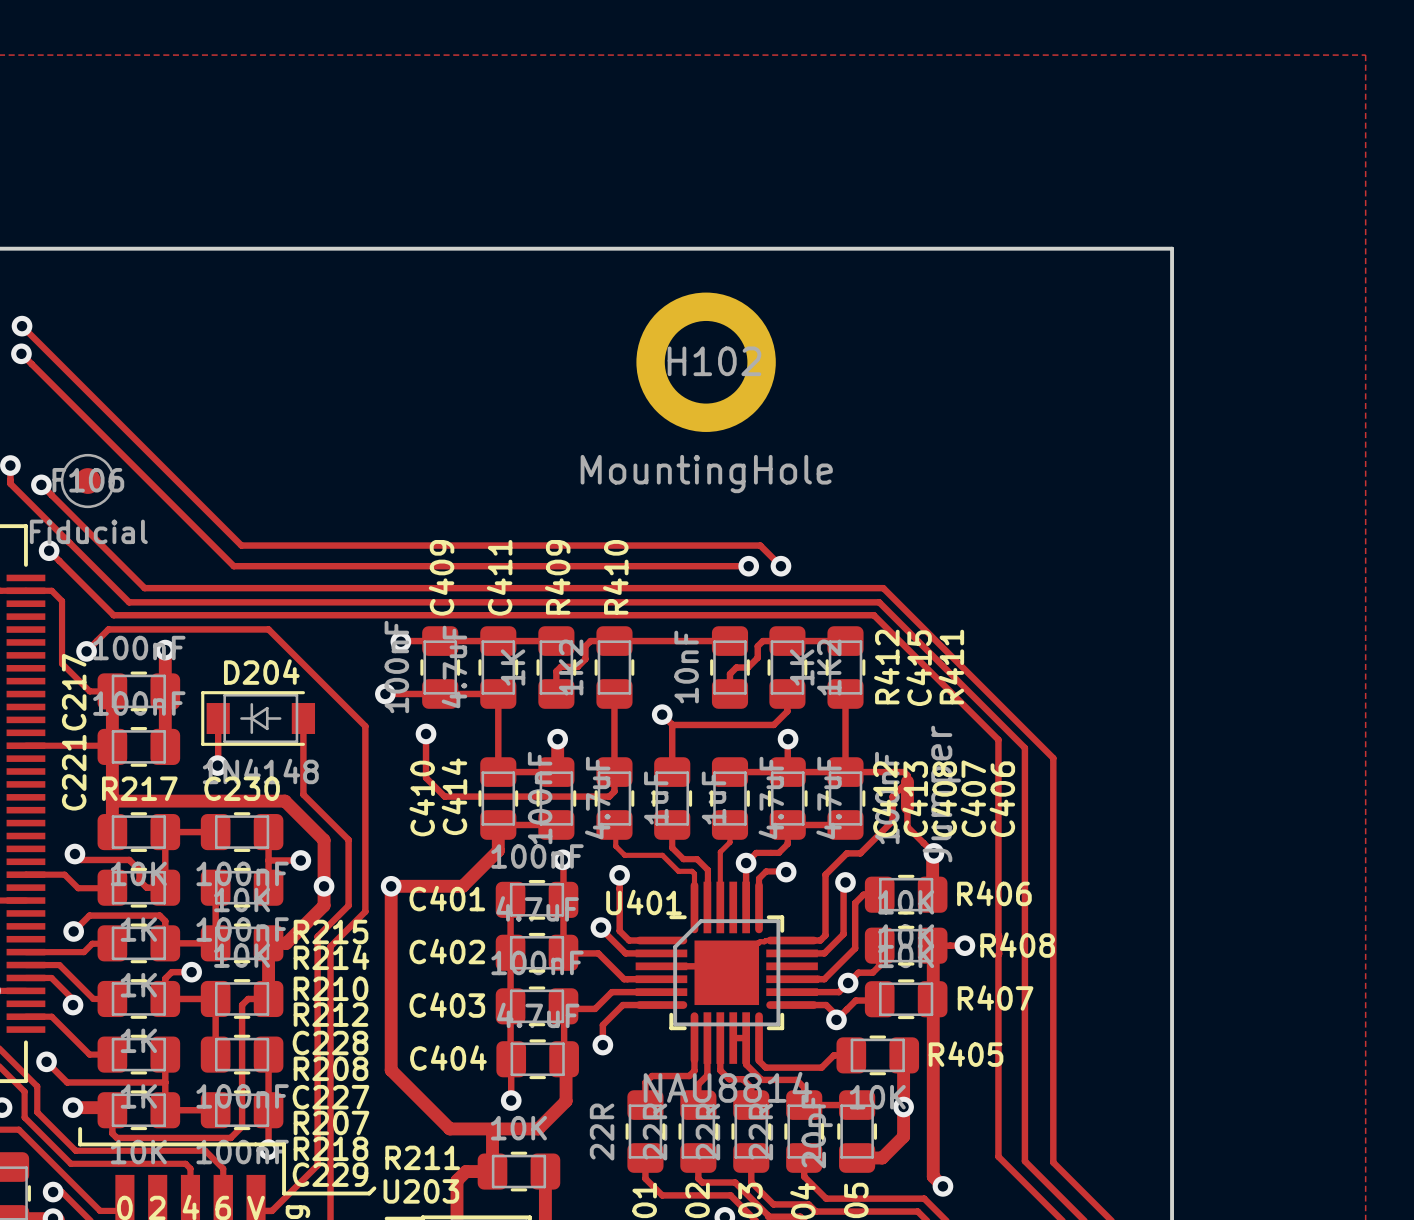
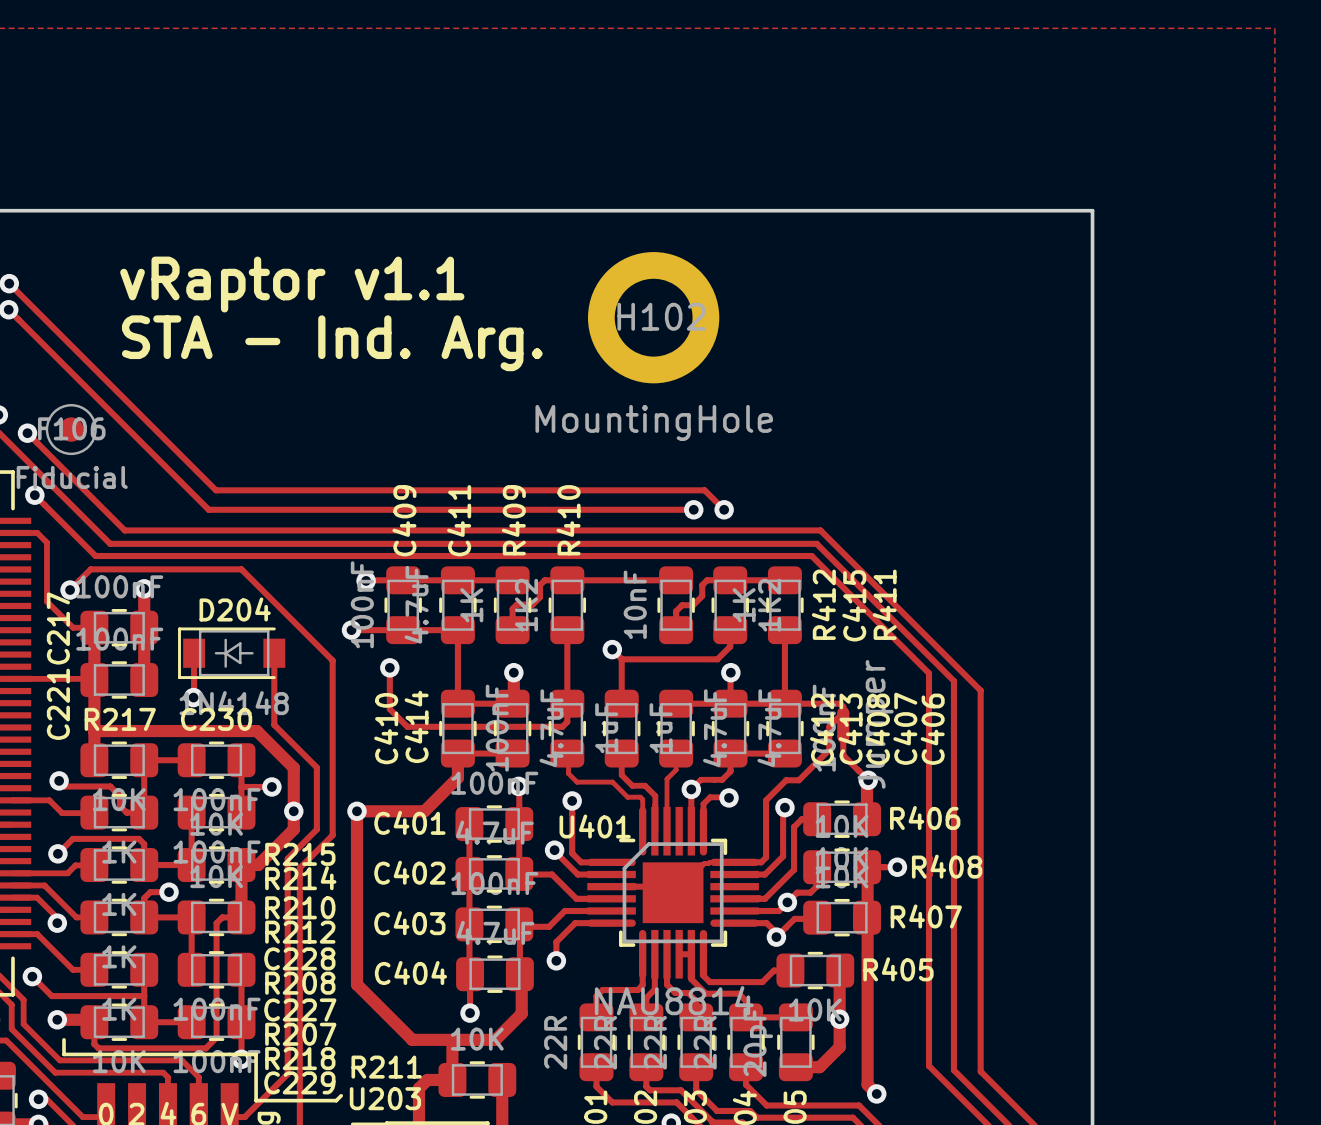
text: none -> vRaptor v1.1 (292, 284)
text: none -> STA - Ind. Arg. (332, 343)

